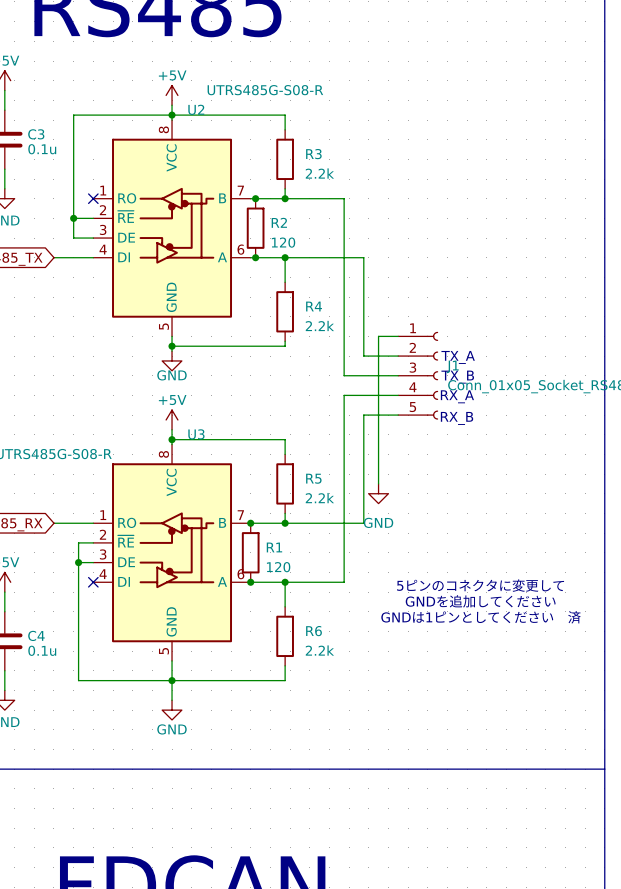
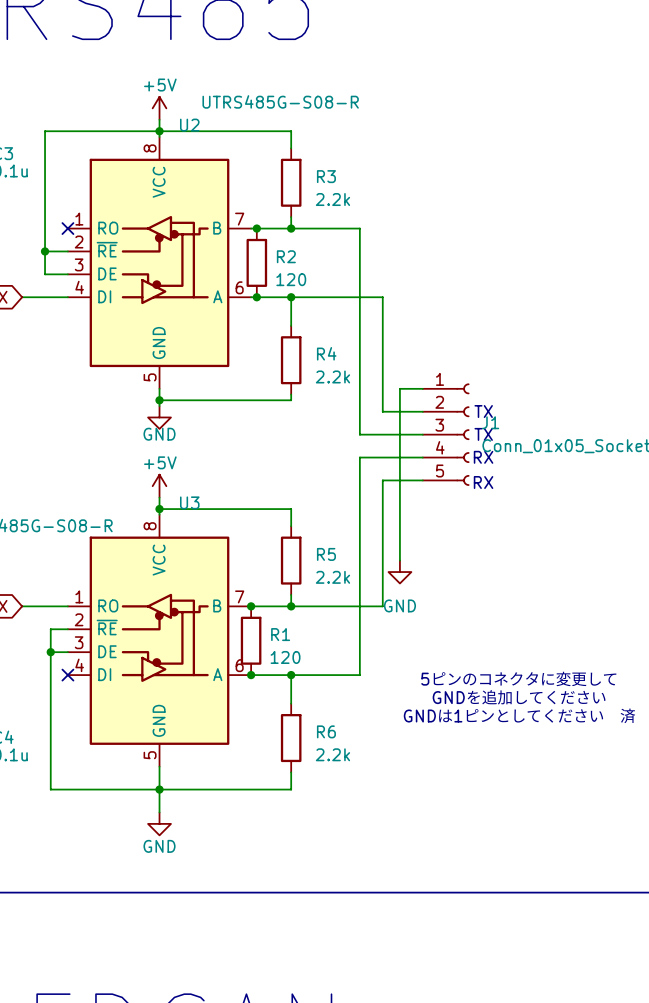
text: TX_A (458, 357) -> TX (483, 411)
text: TX_B (457, 377) -> TX (483, 434)
text: RX_A (457, 396) -> RX (483, 457)
text: RX_B (457, 418) -> RX (483, 482)

